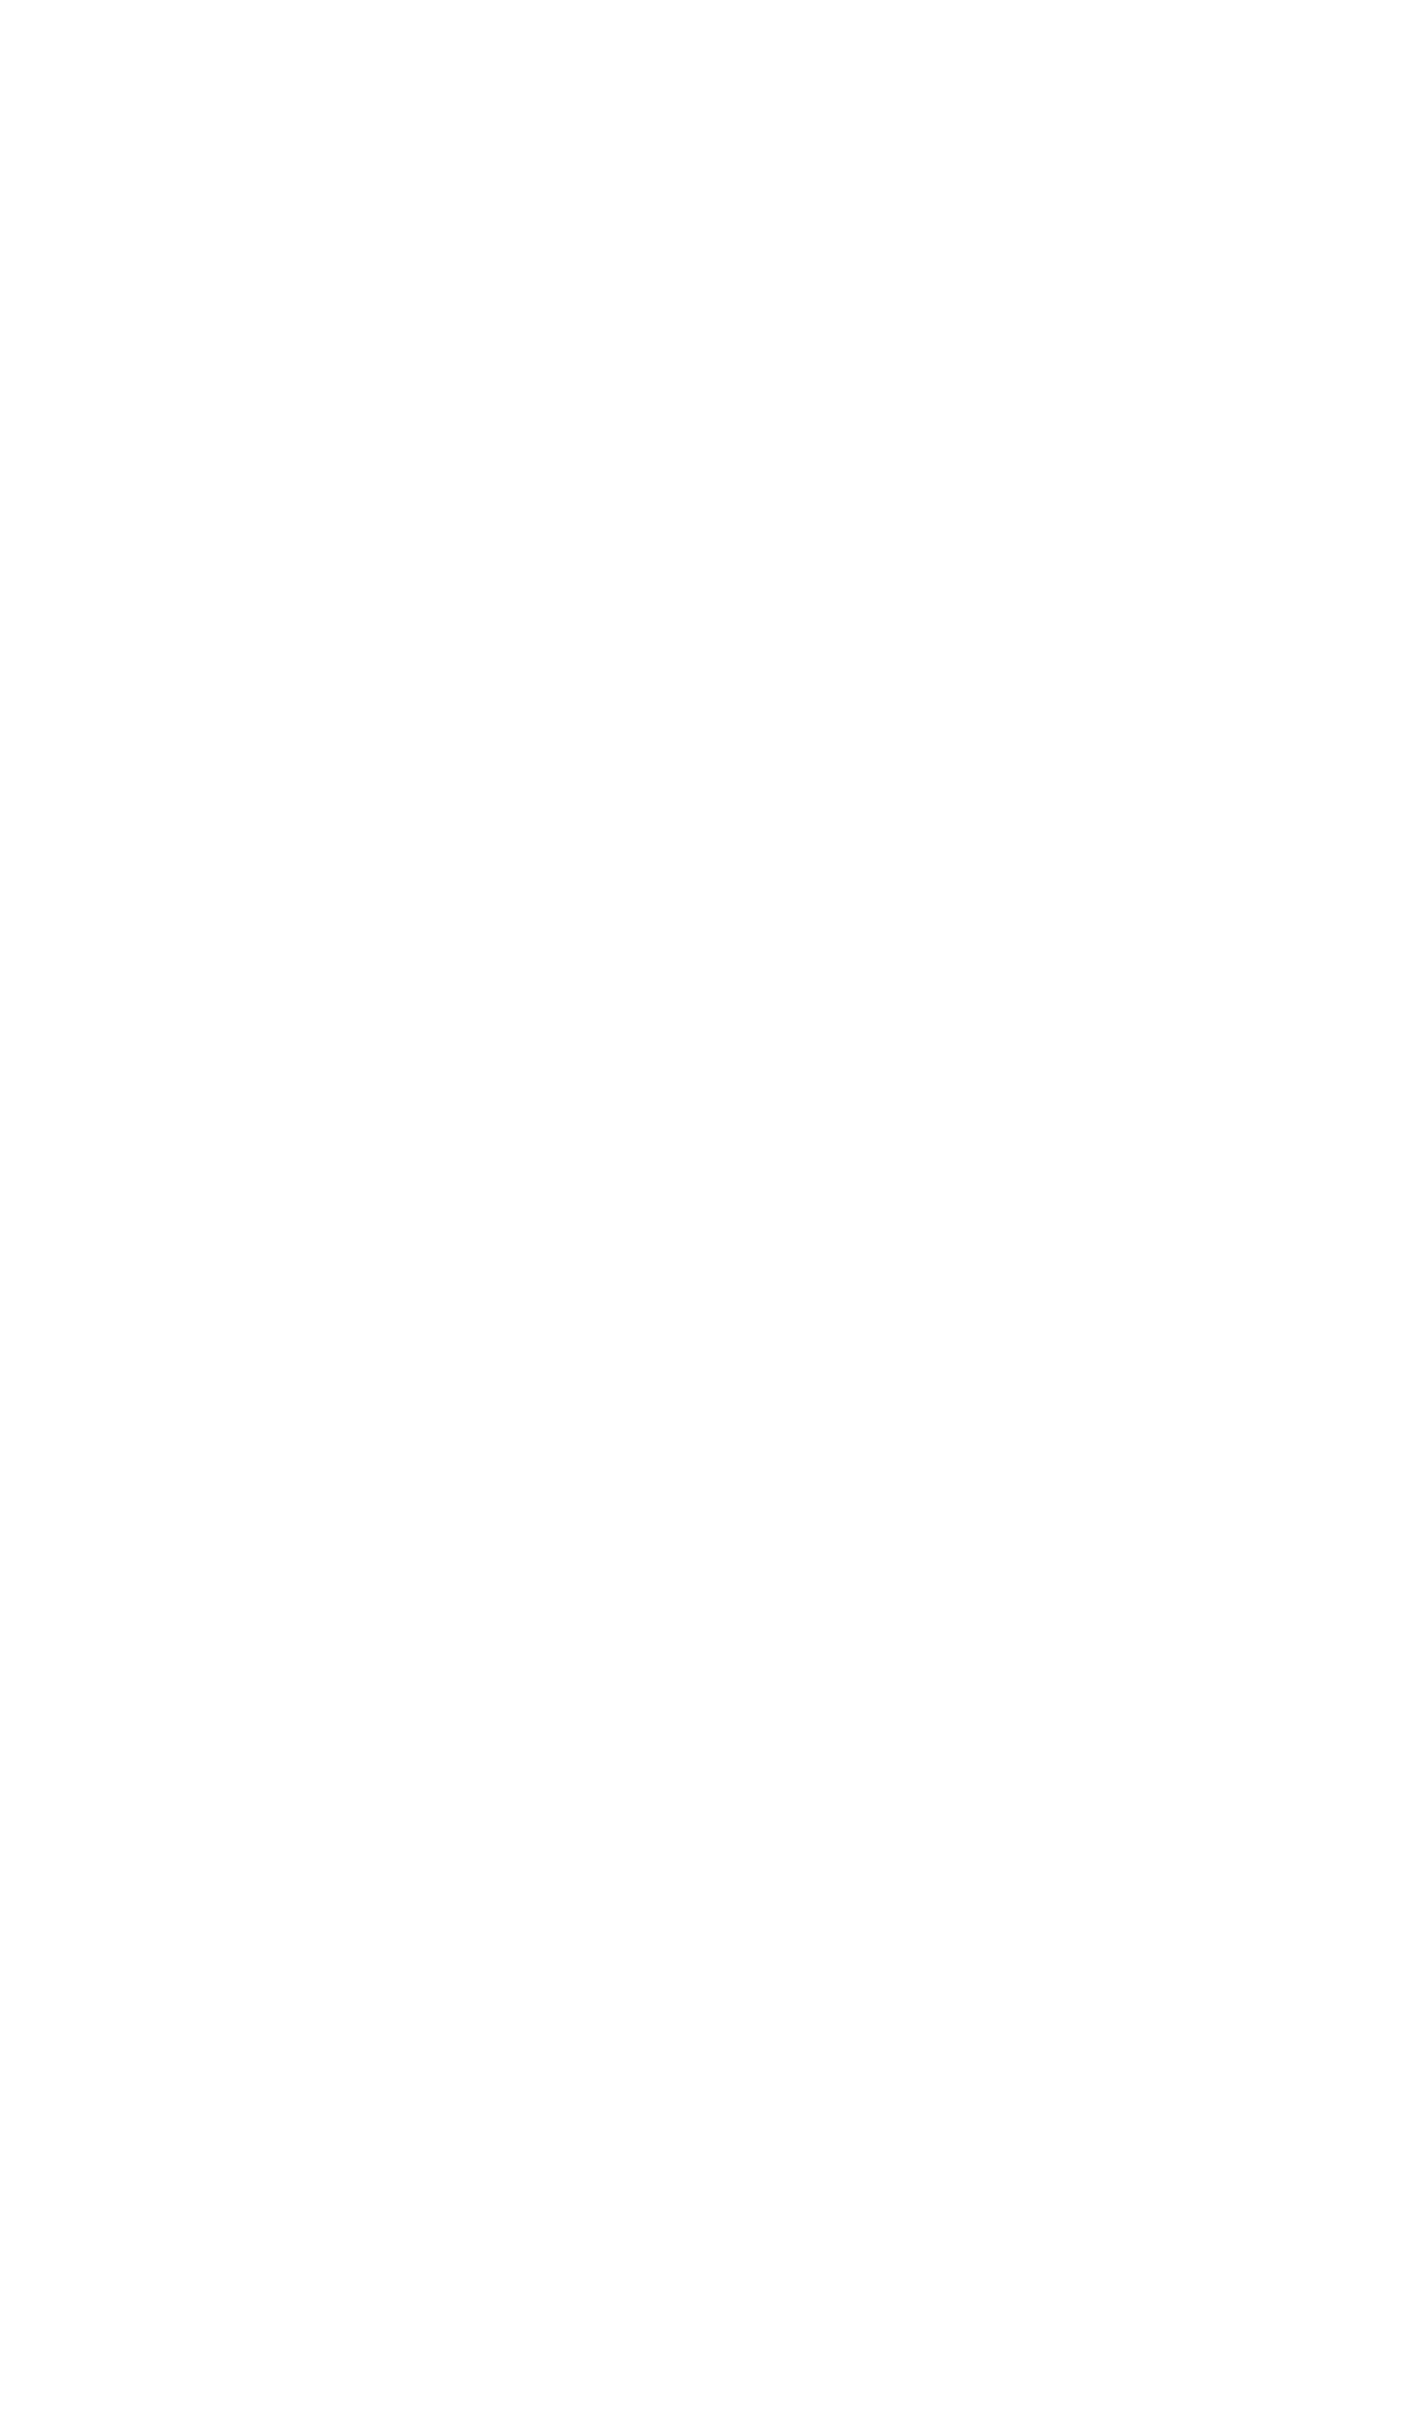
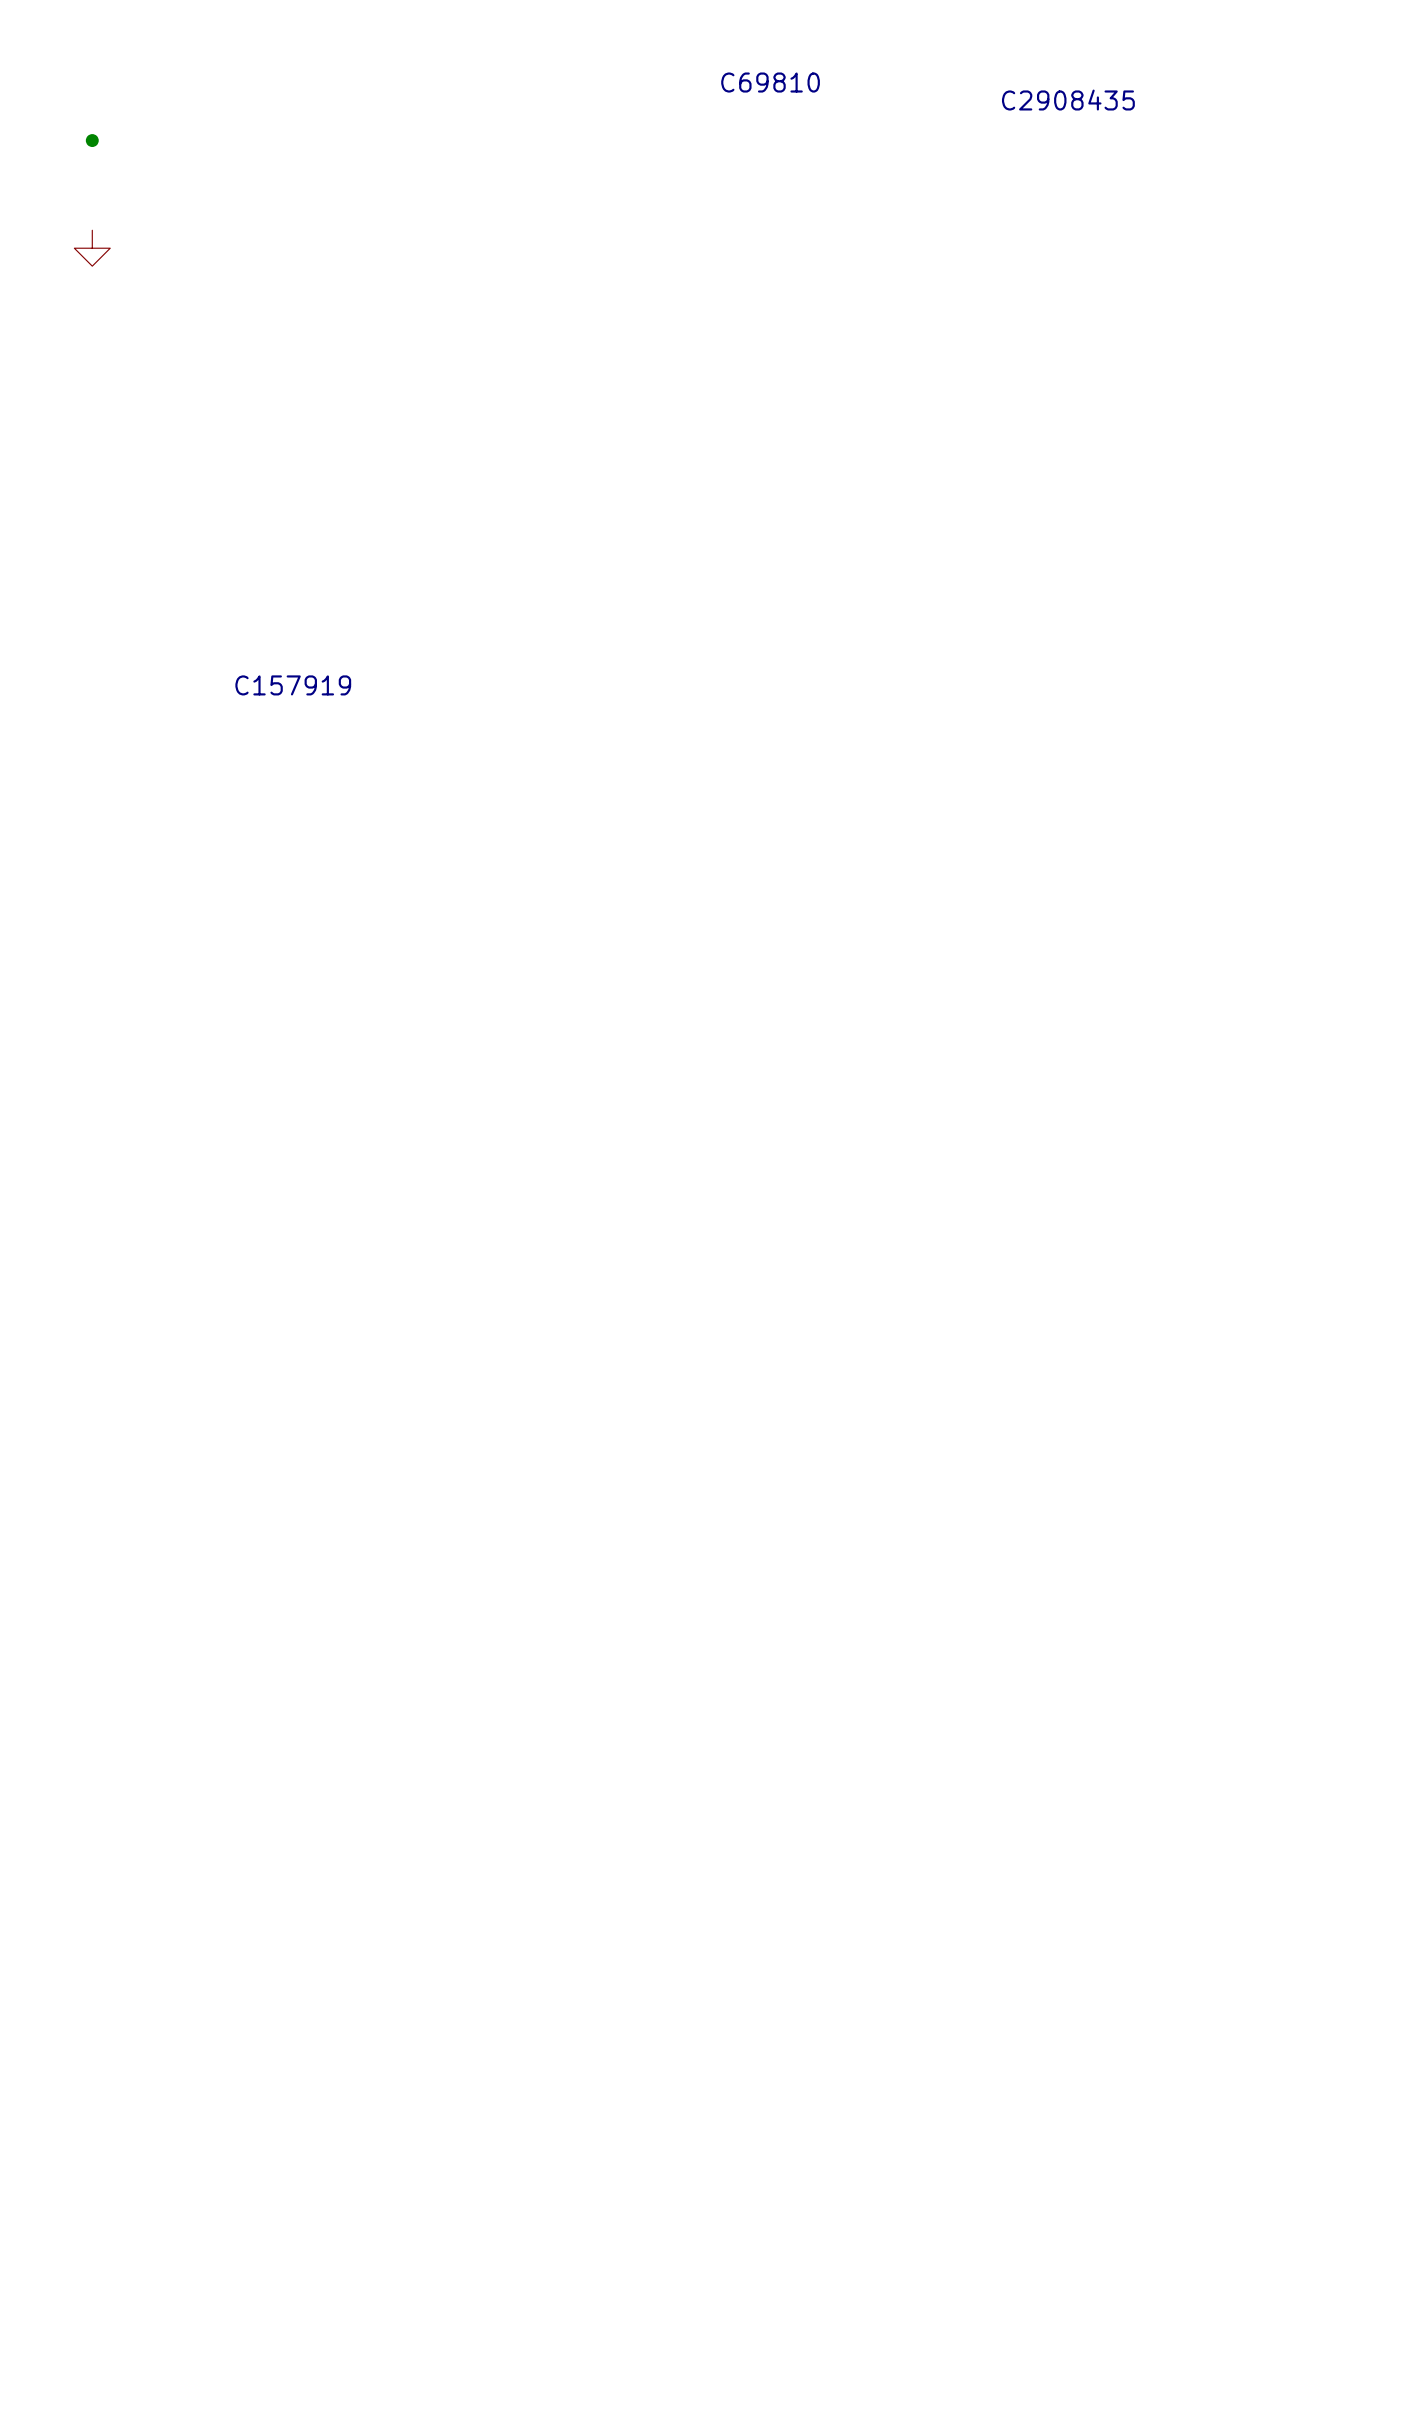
text: none -> C69810 (770, 82)
text: none -> C2908435 (1068, 100)
junction: none -> (92, 140)
power symbol: none -> (92, 248)
text: none -> C157919 (293, 685)

